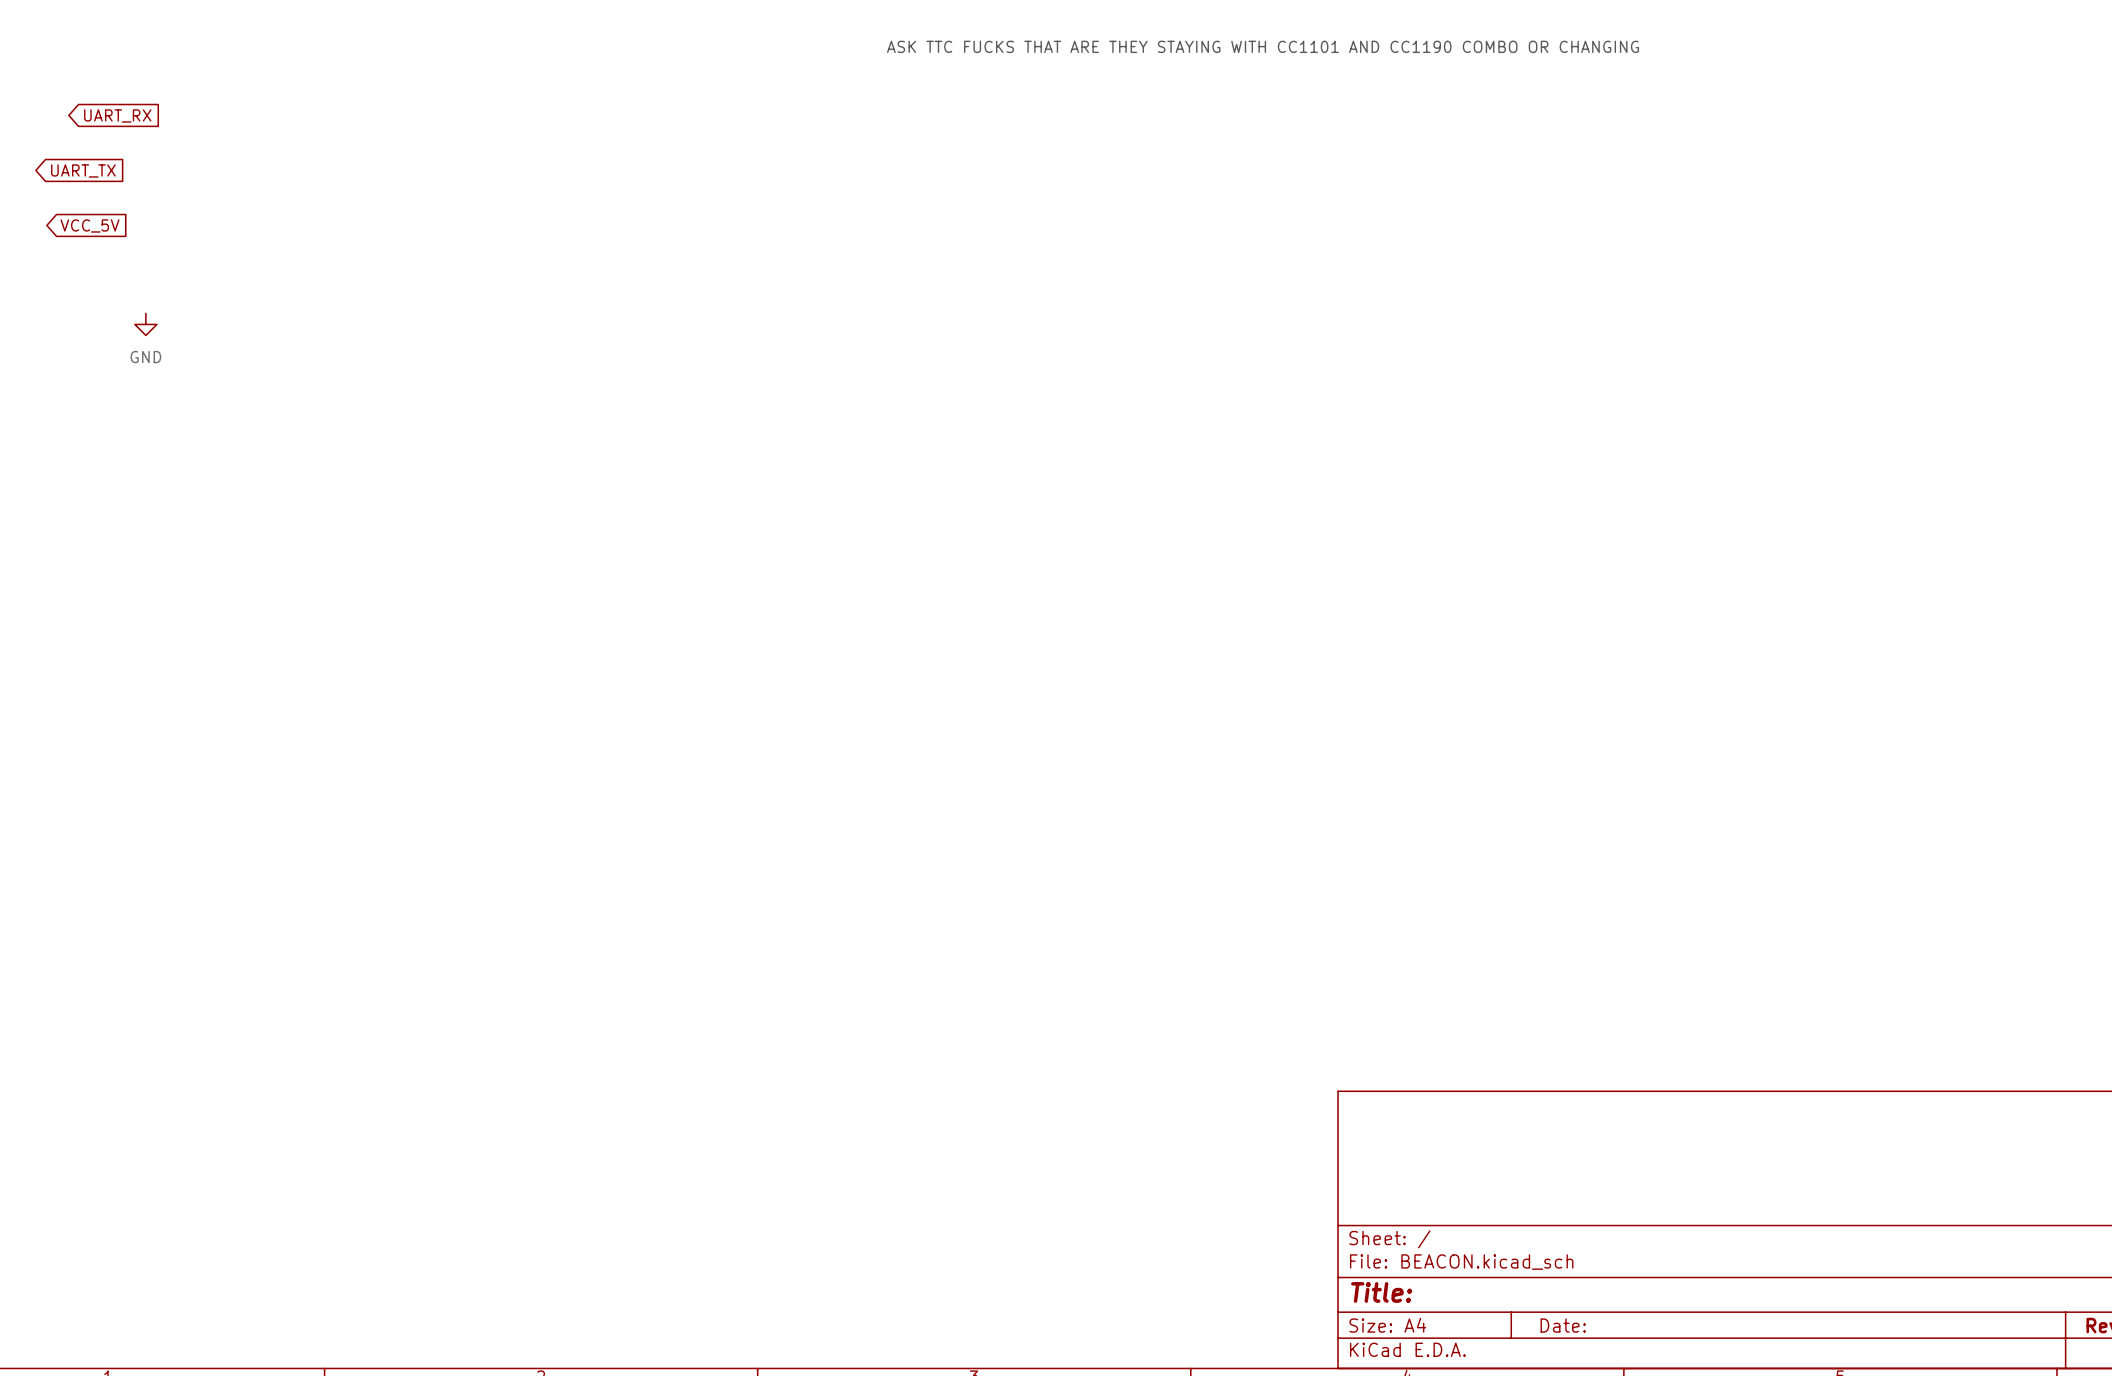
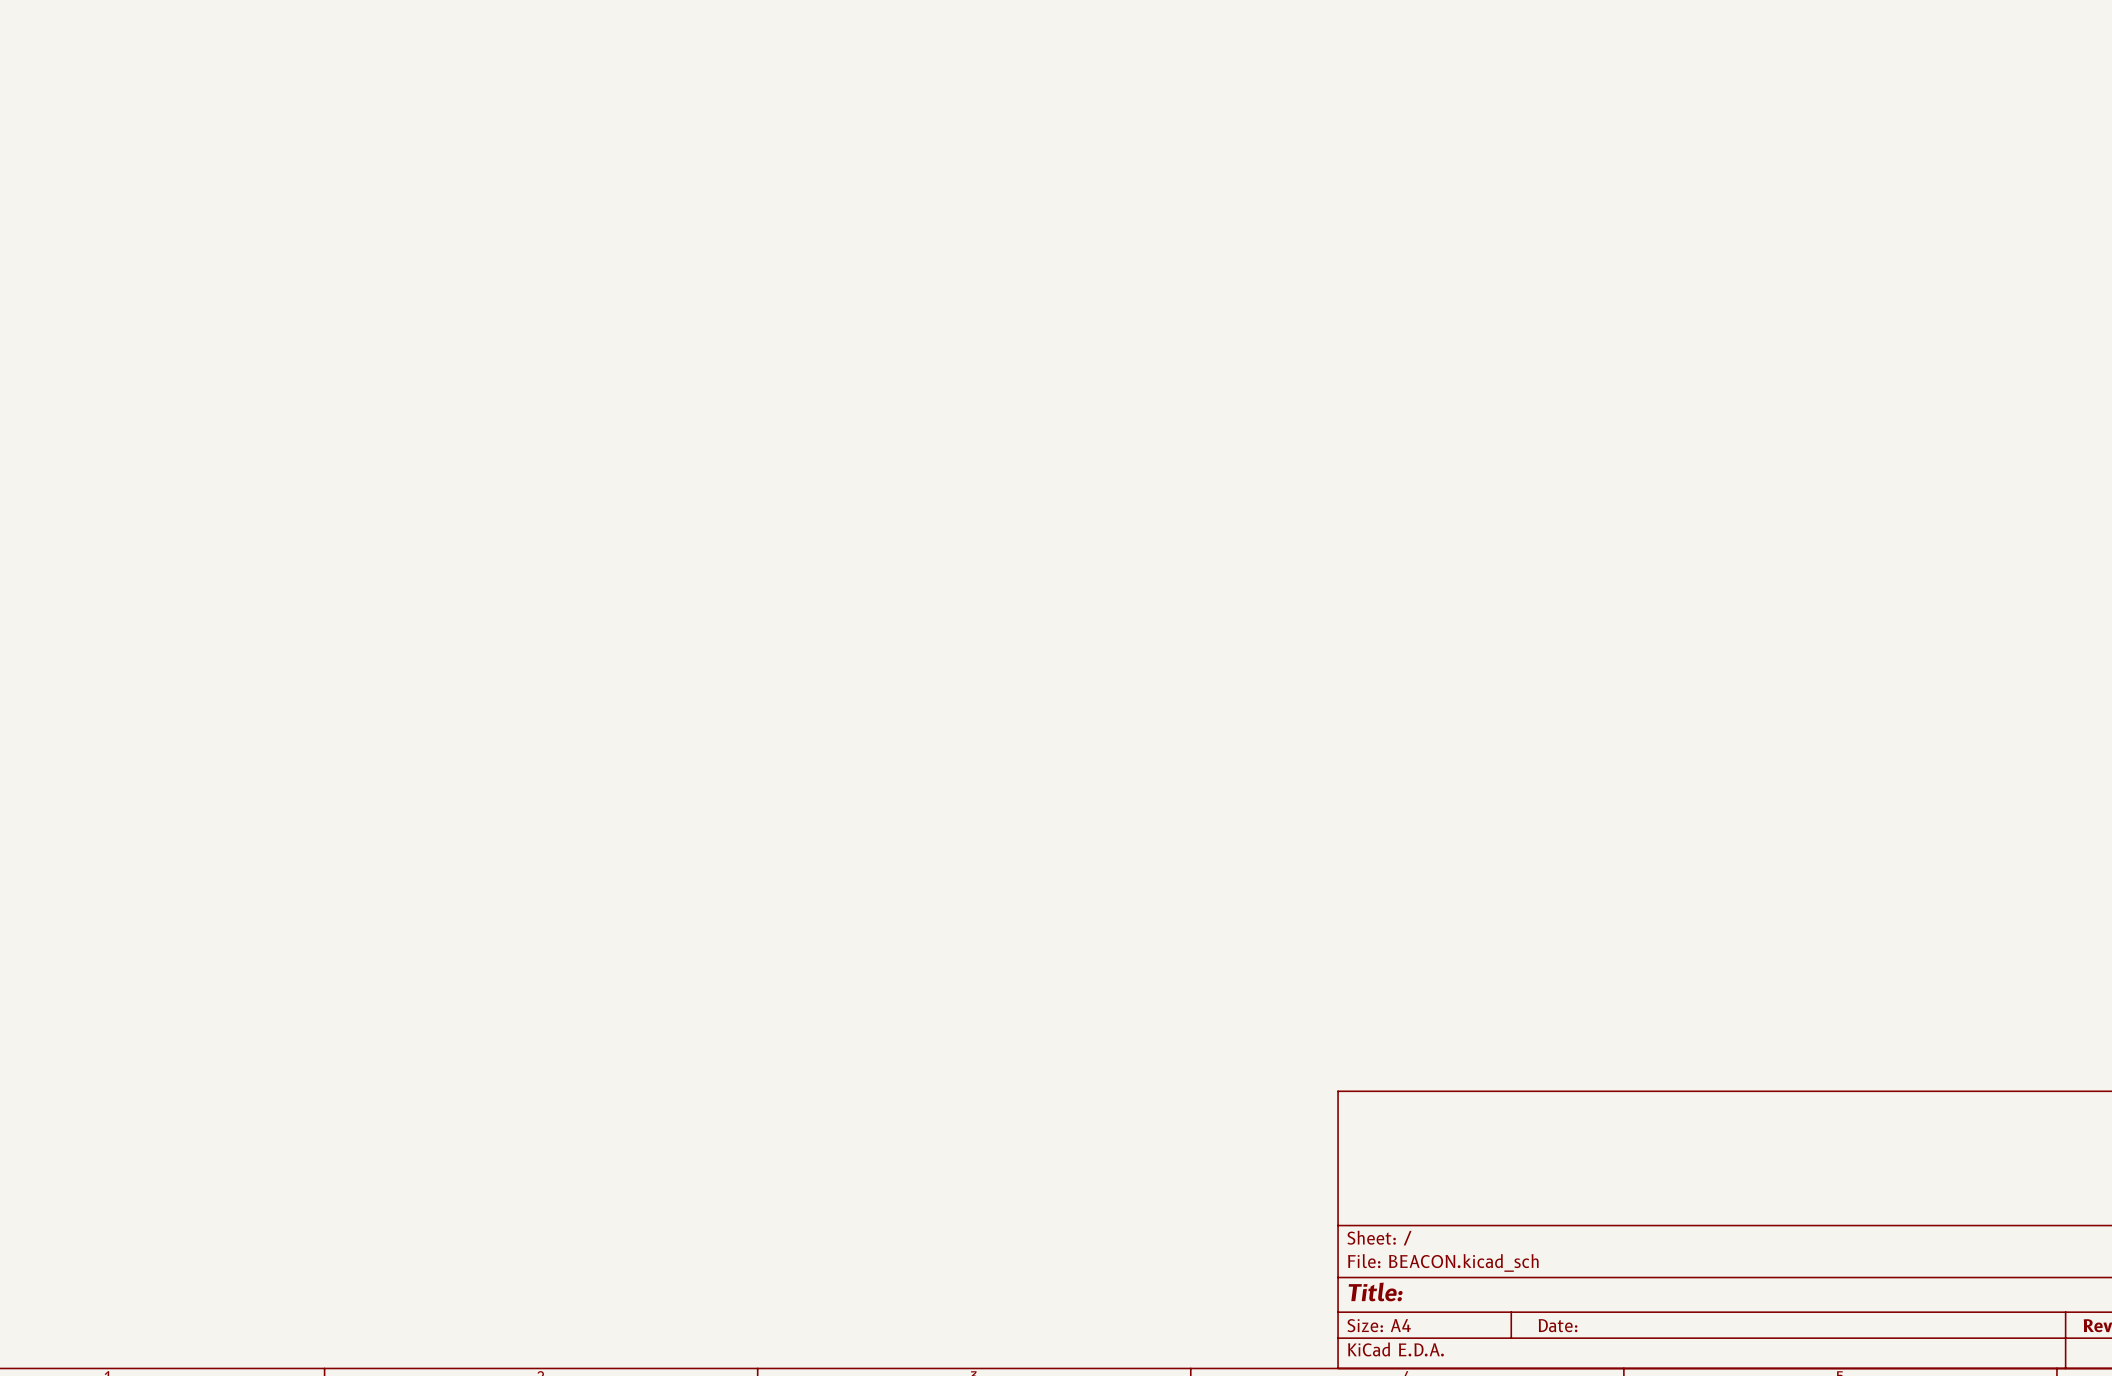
text: ASK TTC FUCKS THAT ARE THEY STAYING WITH CC1101 AND CC1190 COMBO OR CHANGING (1263, 46) -> none
global label: UART_RX (117, 115) -> none
global label: UART_TX (83, 170) -> none
global label: VCC_5V (89, 225) -> none
power symbol: GND (145, 324) -> none

